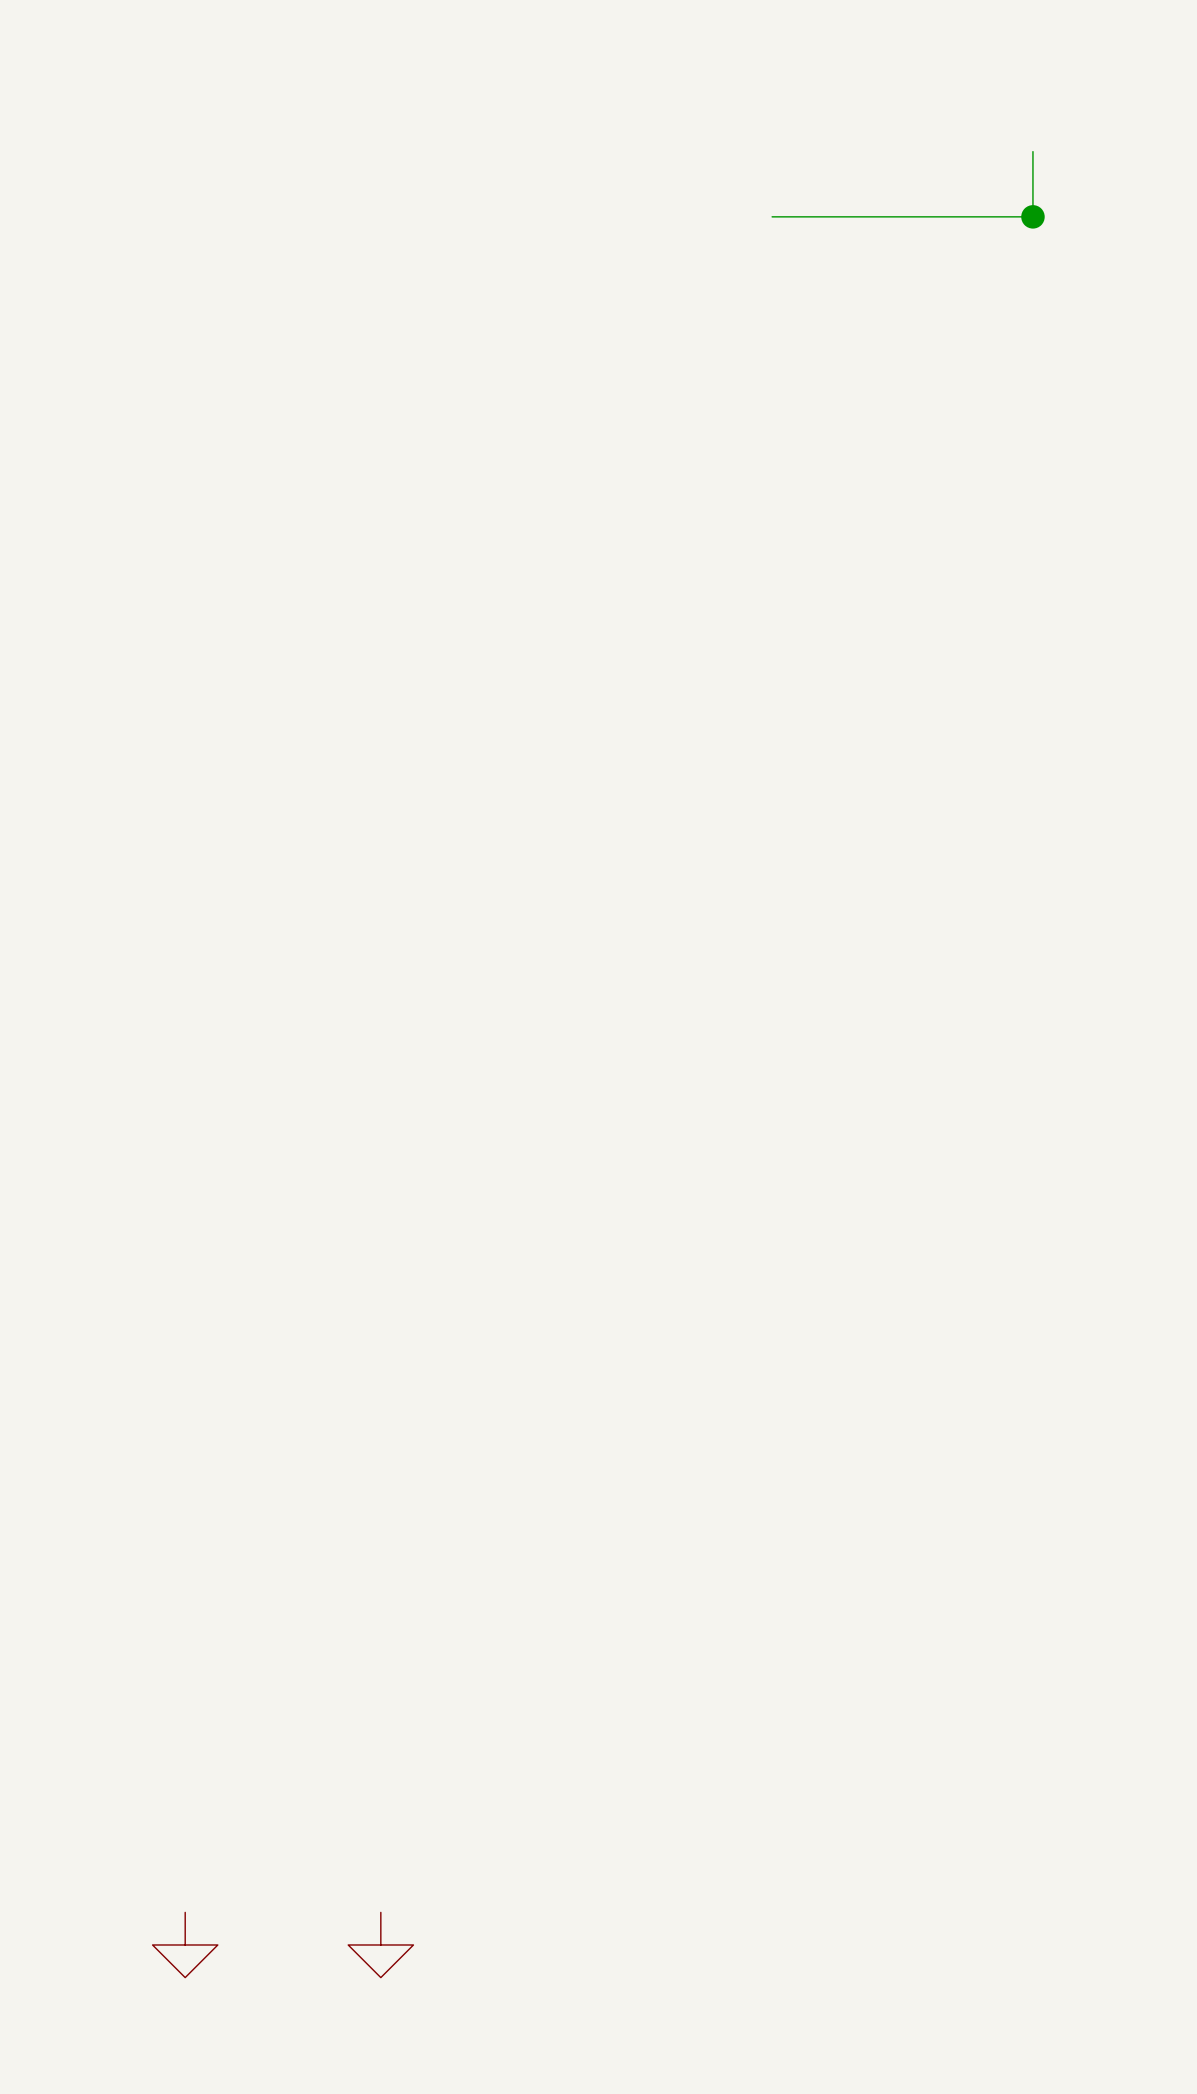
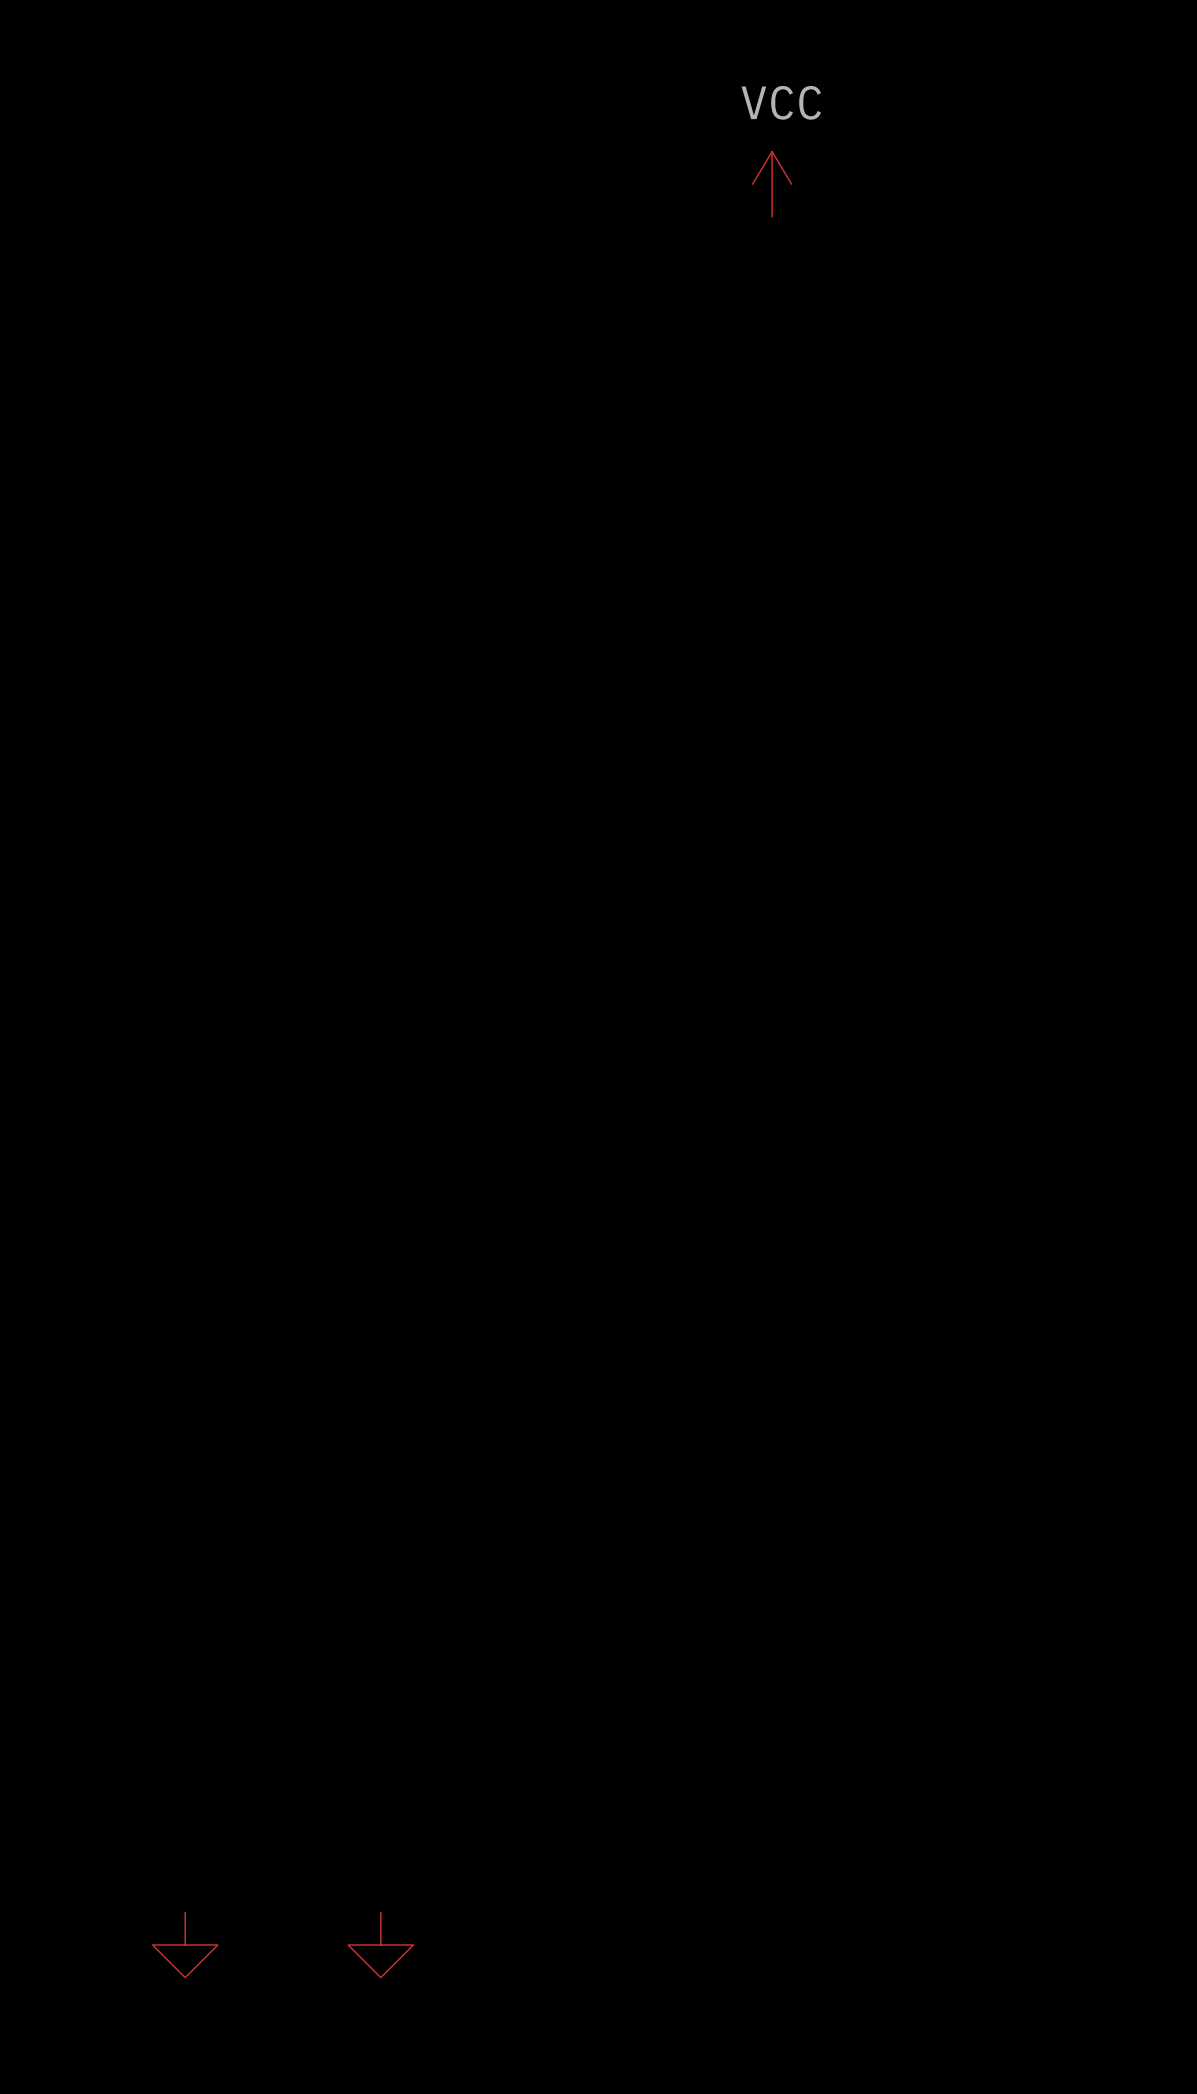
wire: (1032, 151) (1032, 216) (772, 216) -> none
power symbol: none -> VCC (772, 184)
junction: (1032, 216) -> none

